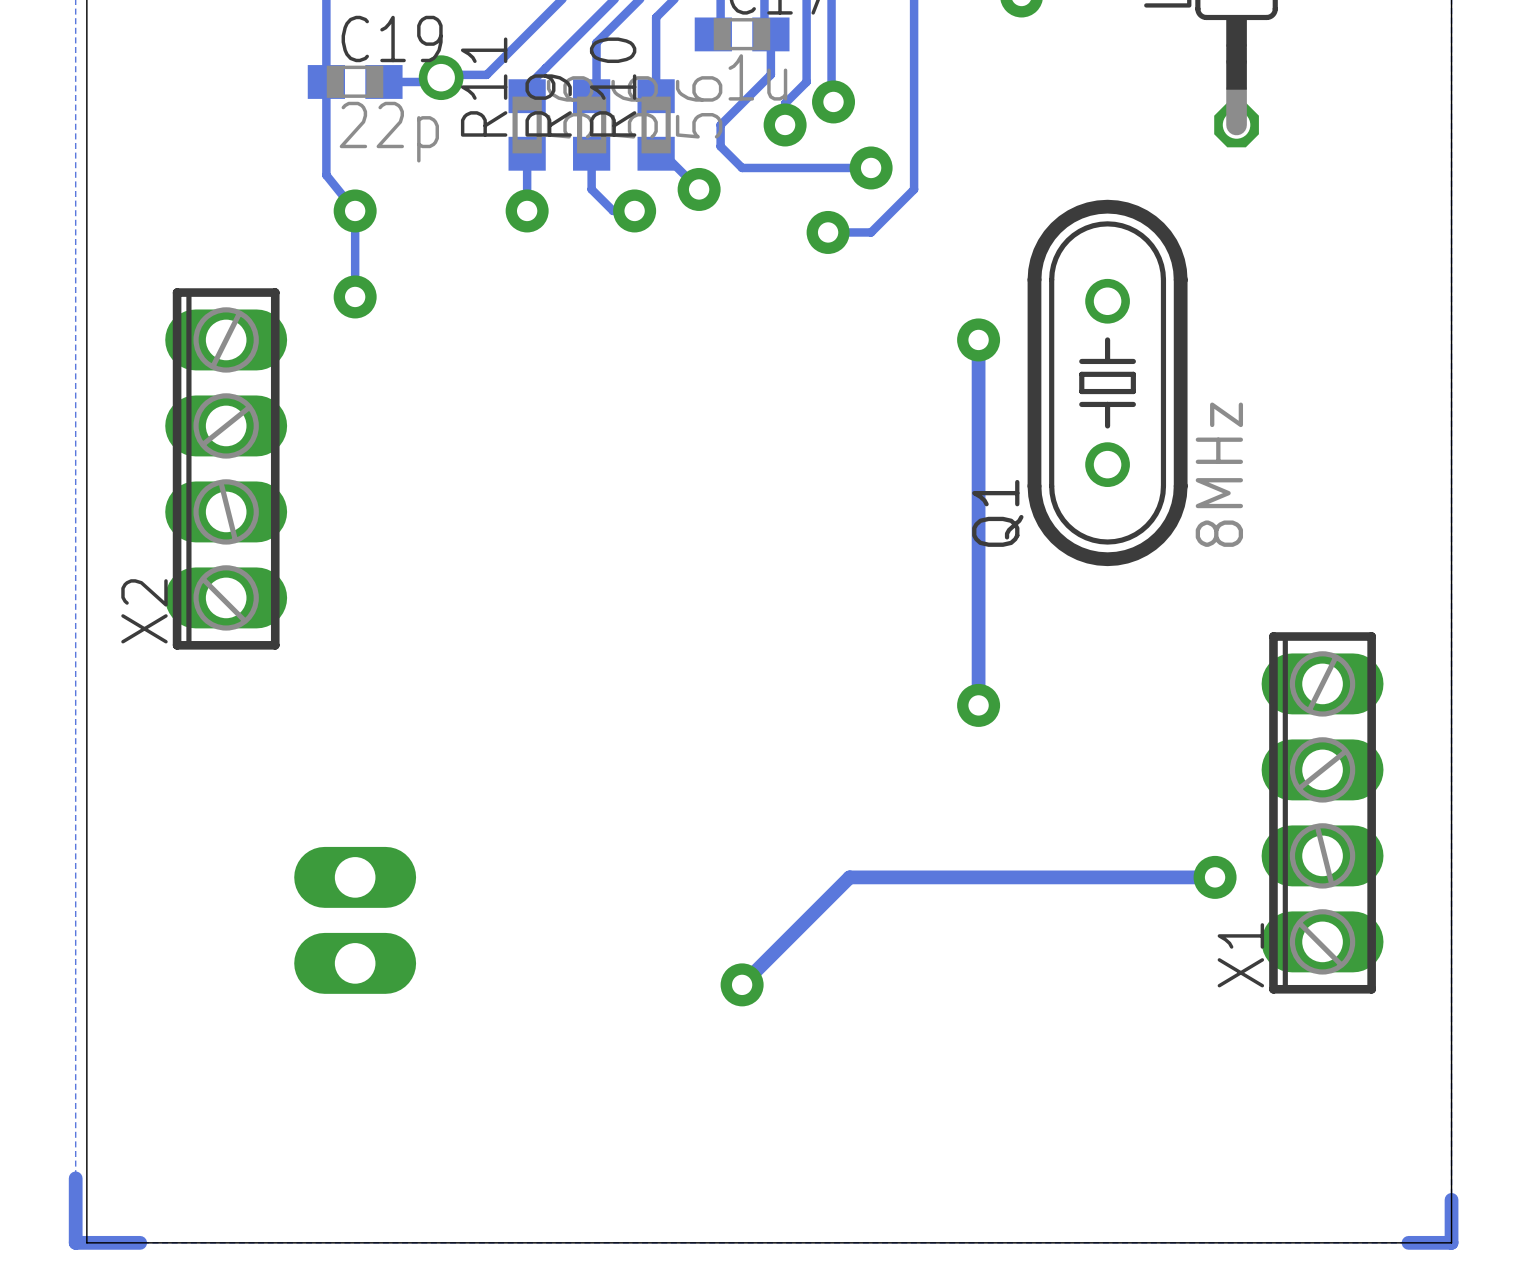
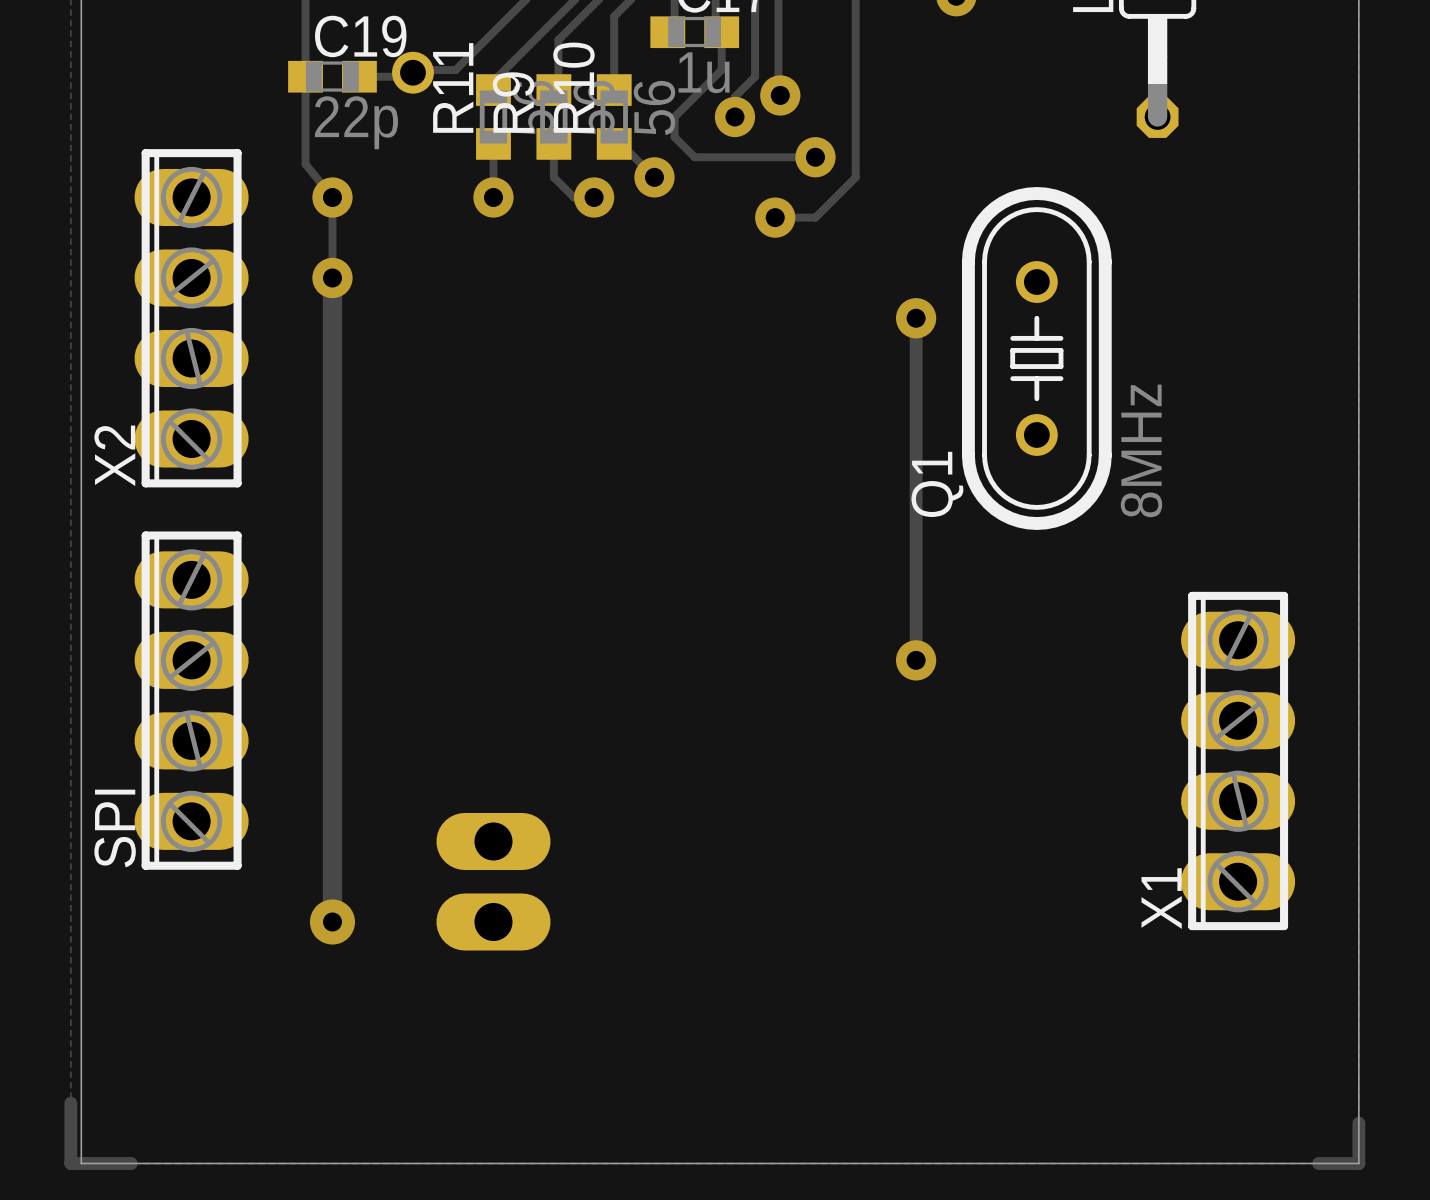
track: none -> (332, 277) (332, 921)
X2 position: (226, 468) -> (191, 318)
SPI: none -> (191, 700)
track: (1215, 877) (849, 877) (742, 984) -> none
via: (1215, 877) -> none
part position: (355, 920) -> (493, 881)
via: none -> (332, 921)
via: (742, 984) -> none

